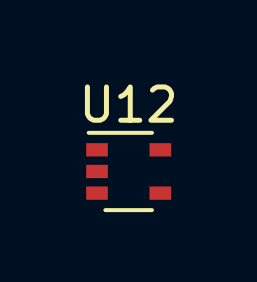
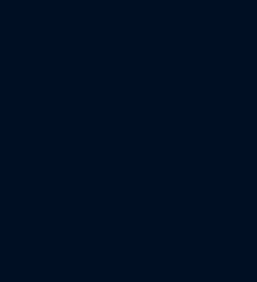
U12: (128, 171) -> none

